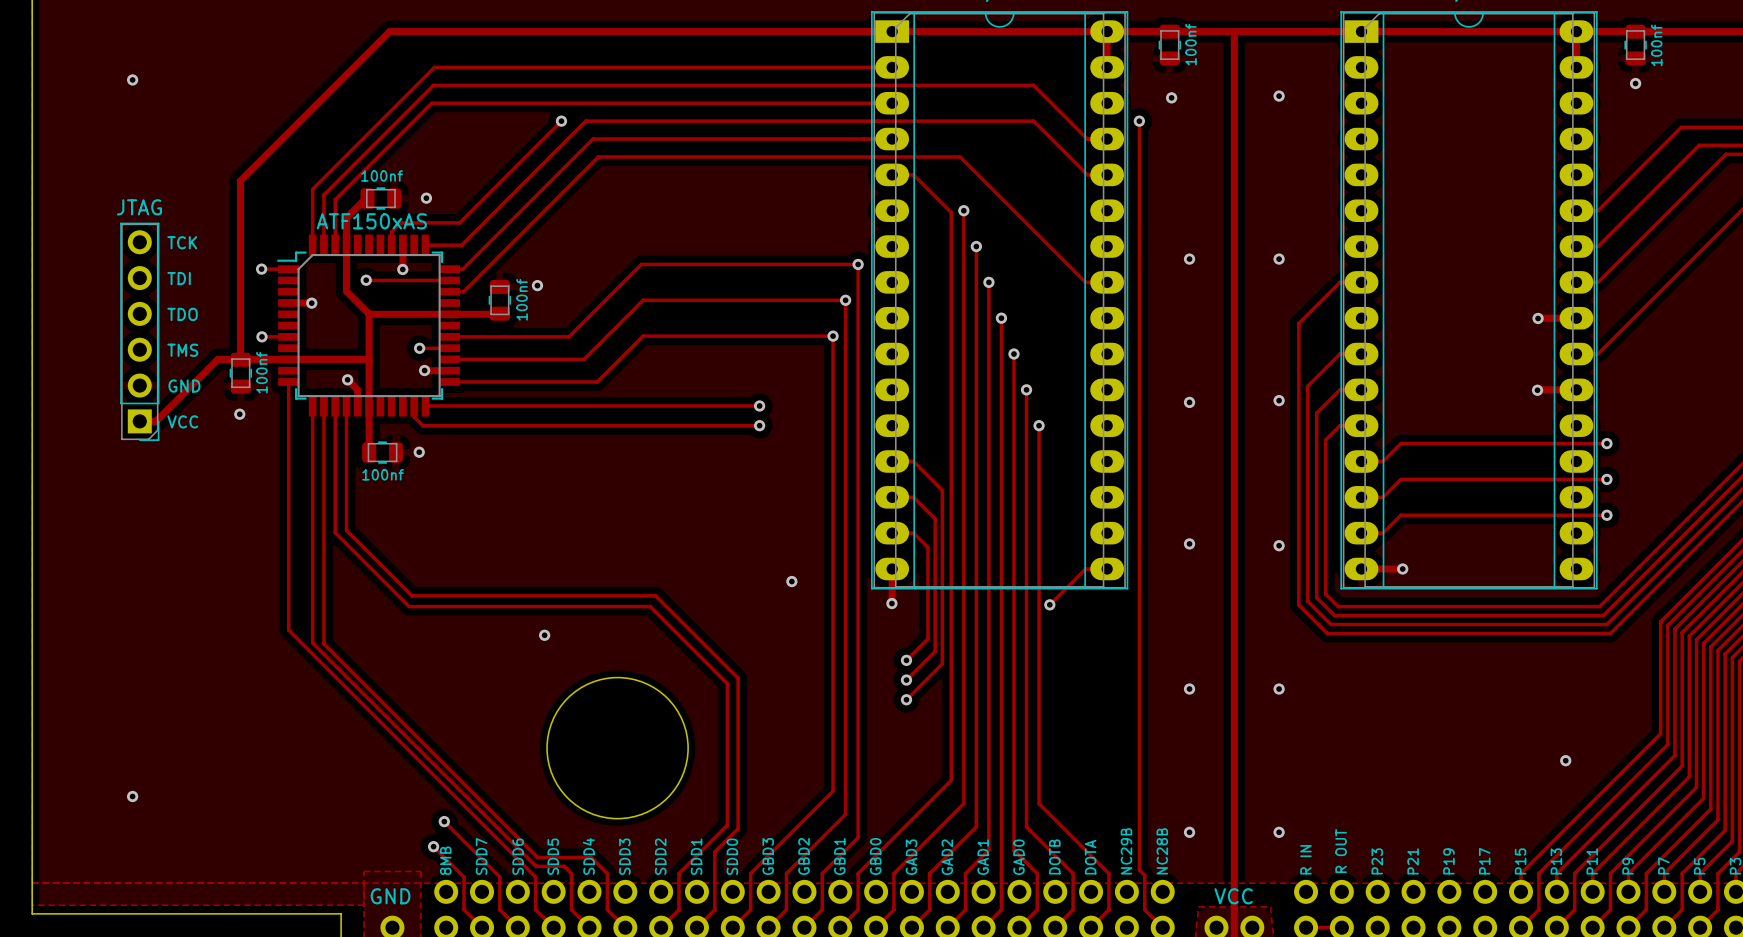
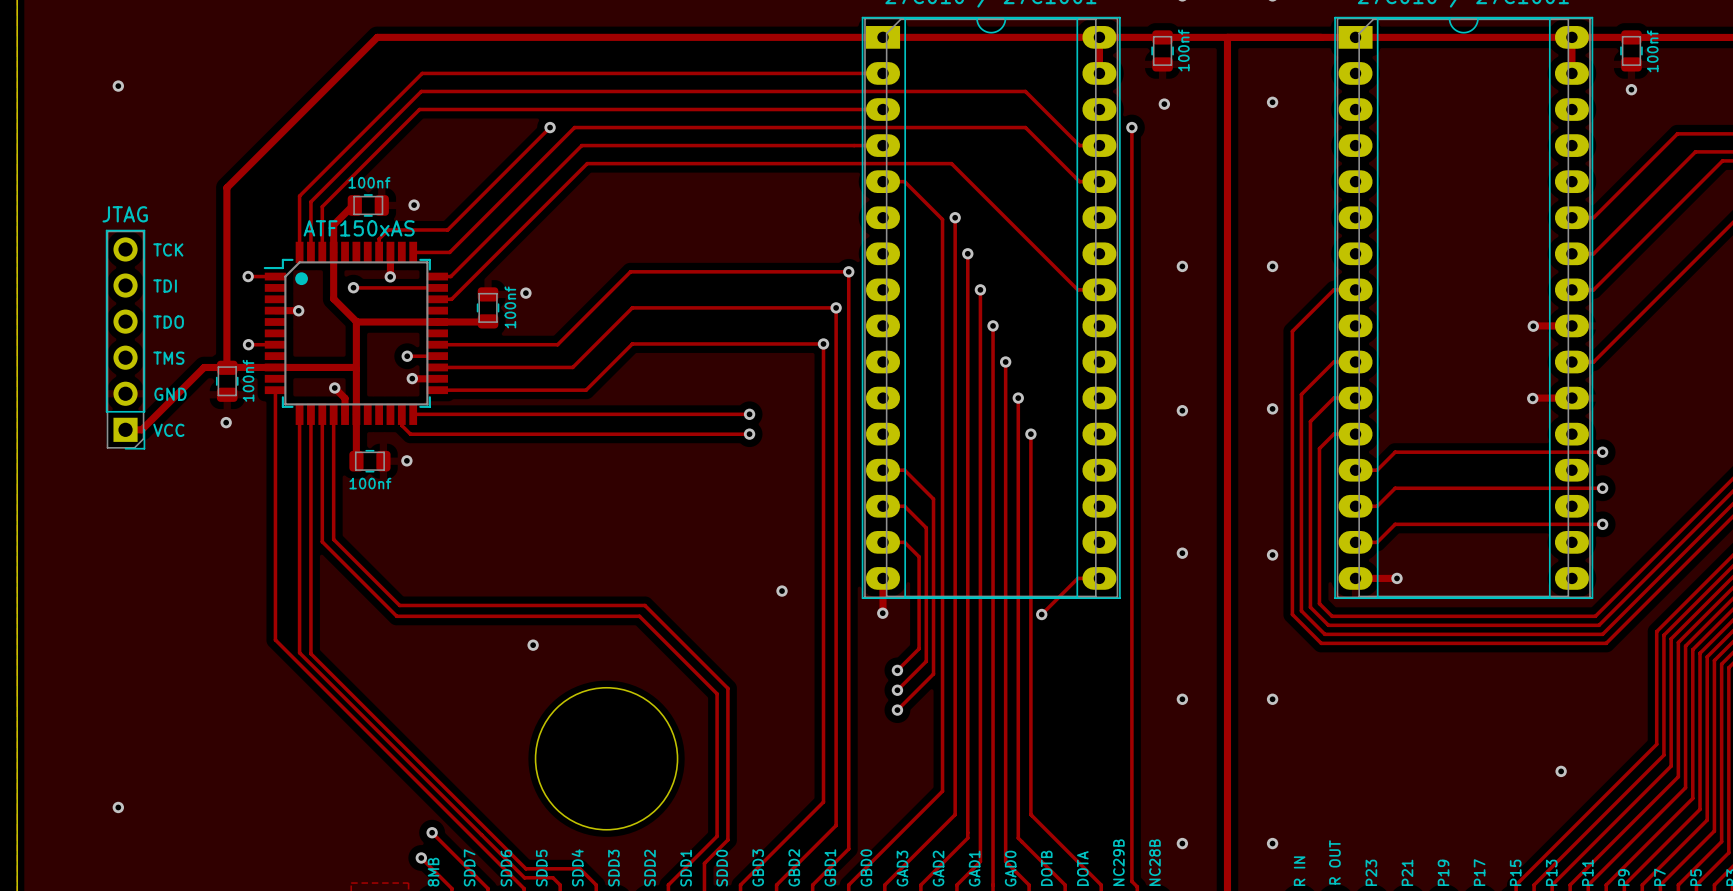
drawing: none -> [295, 272, 308, 286]

